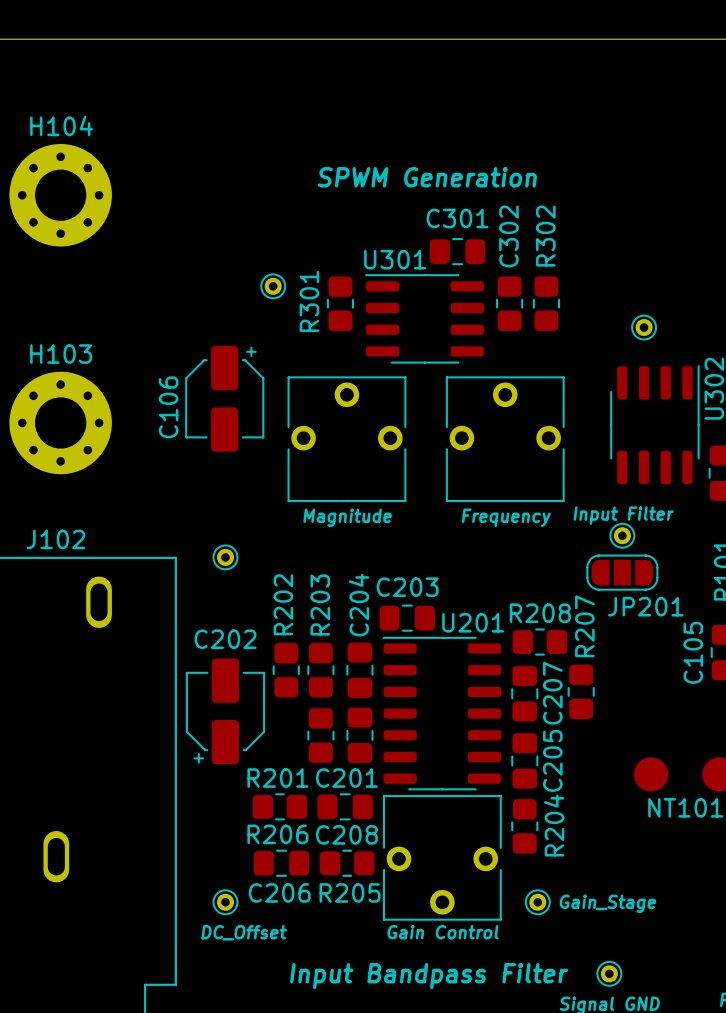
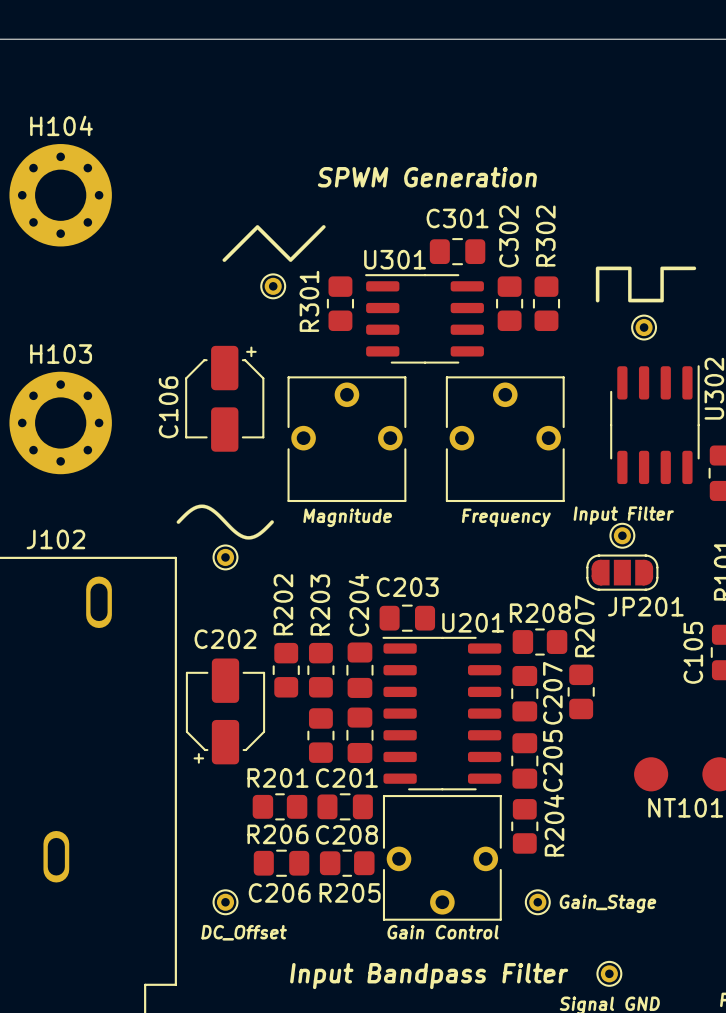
drawing: none -> [222, 225, 326, 262]
drawing: none -> [595, 266, 697, 303]
drawing: none -> [176, 504, 274, 540]

